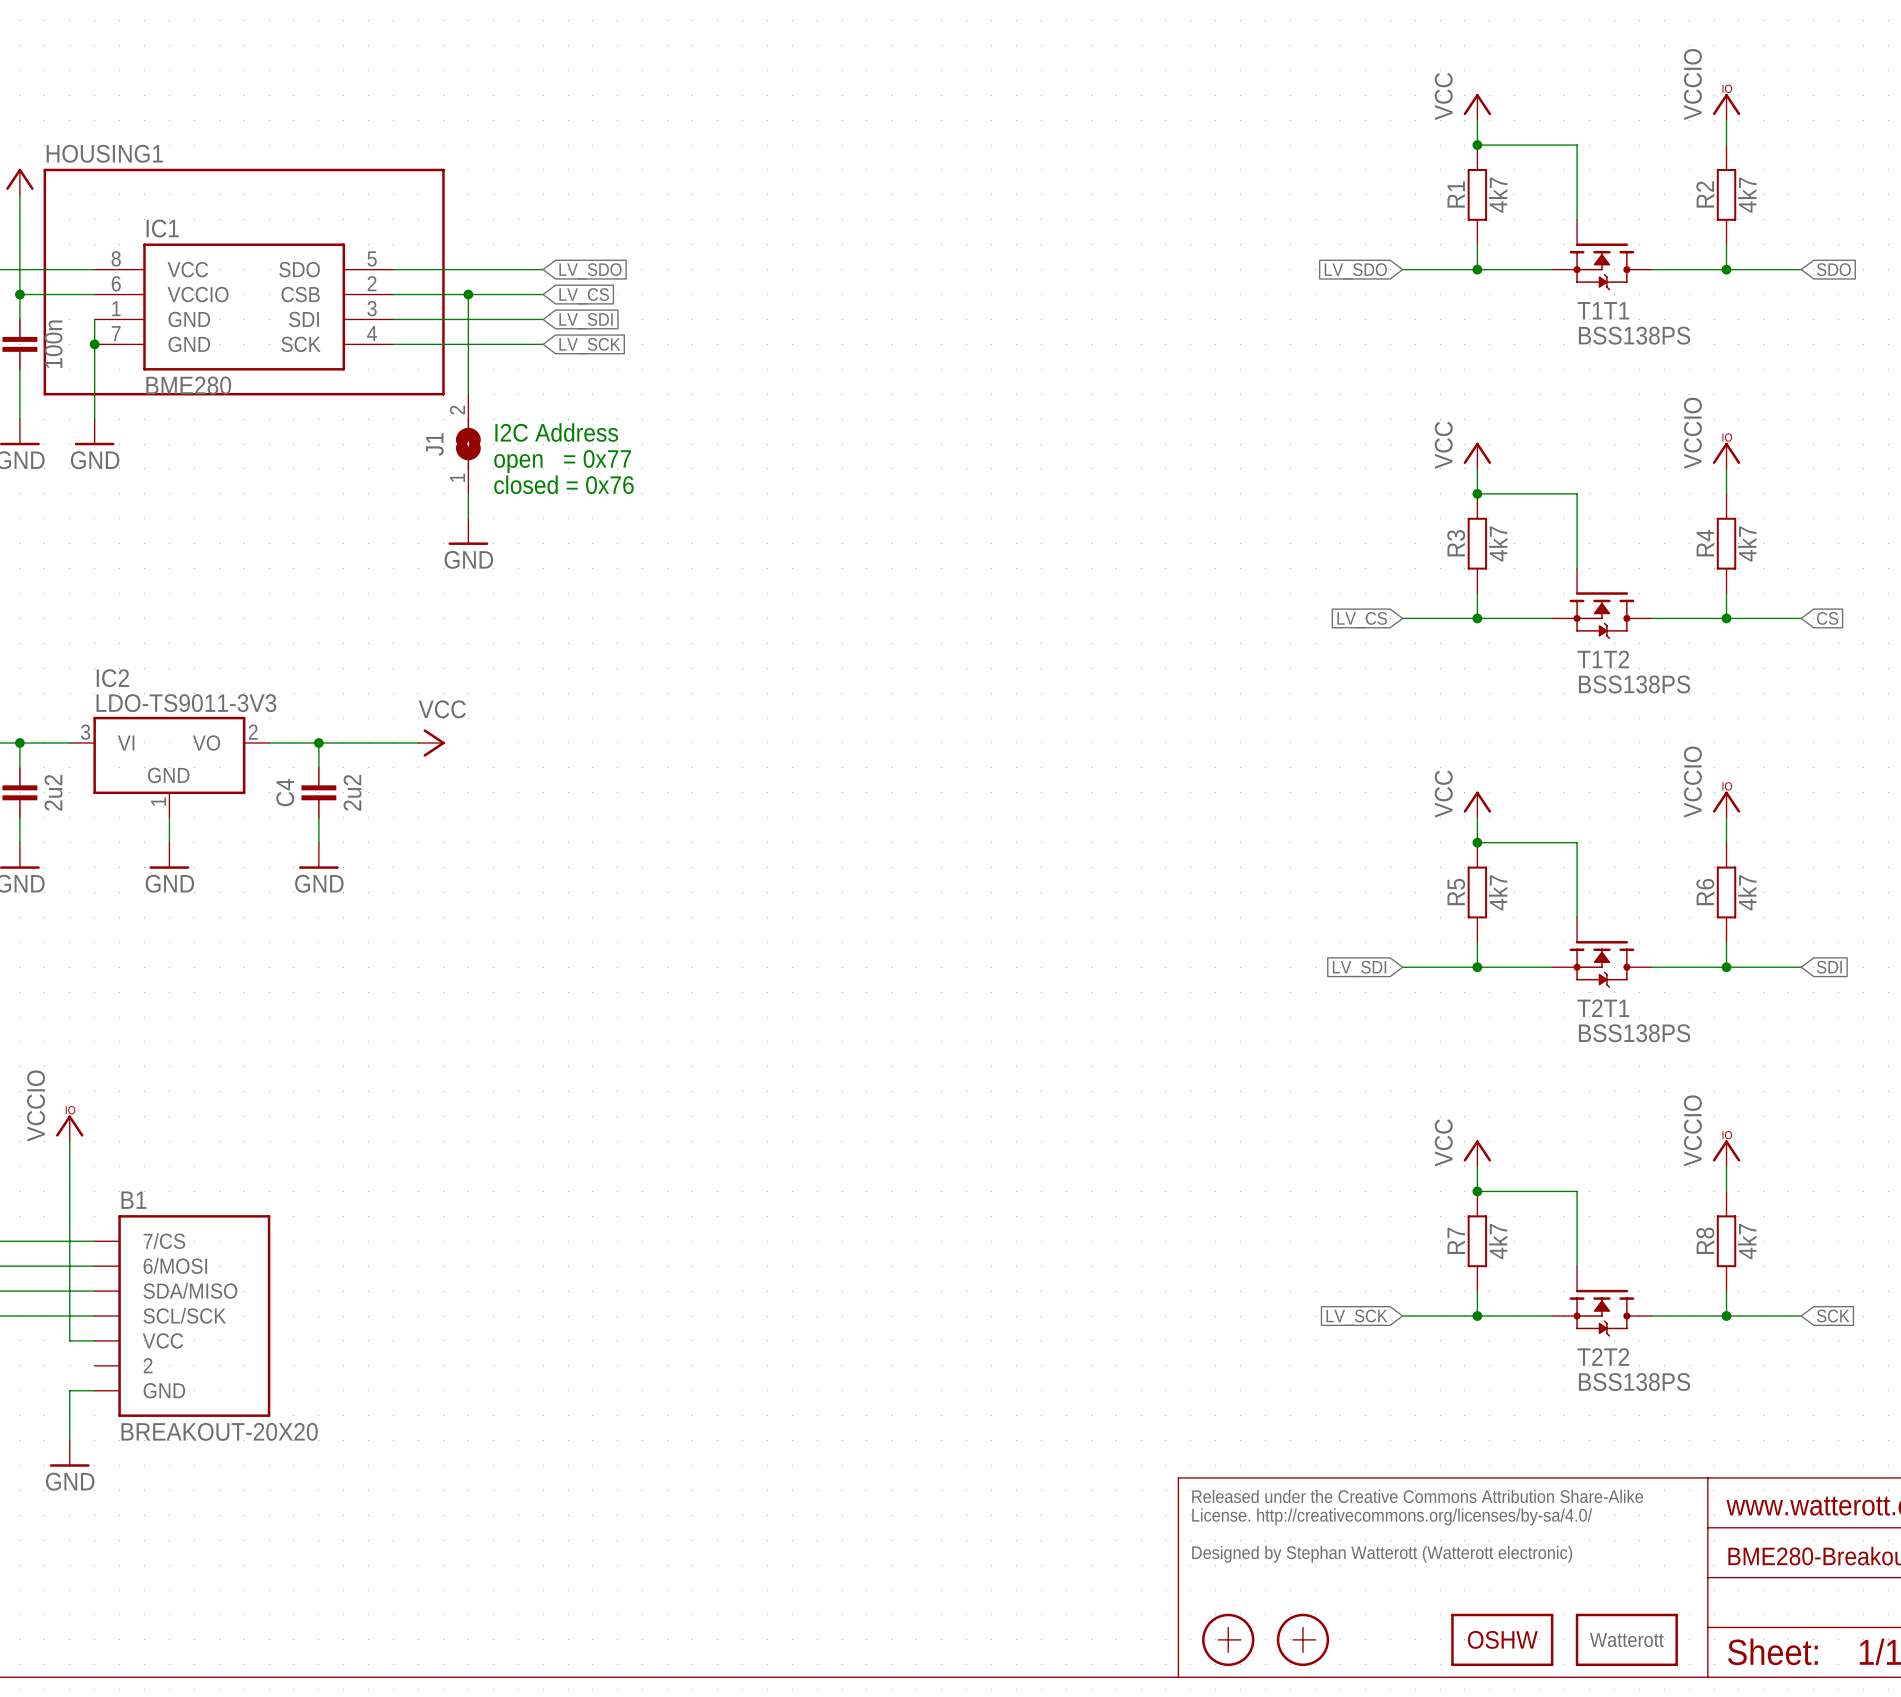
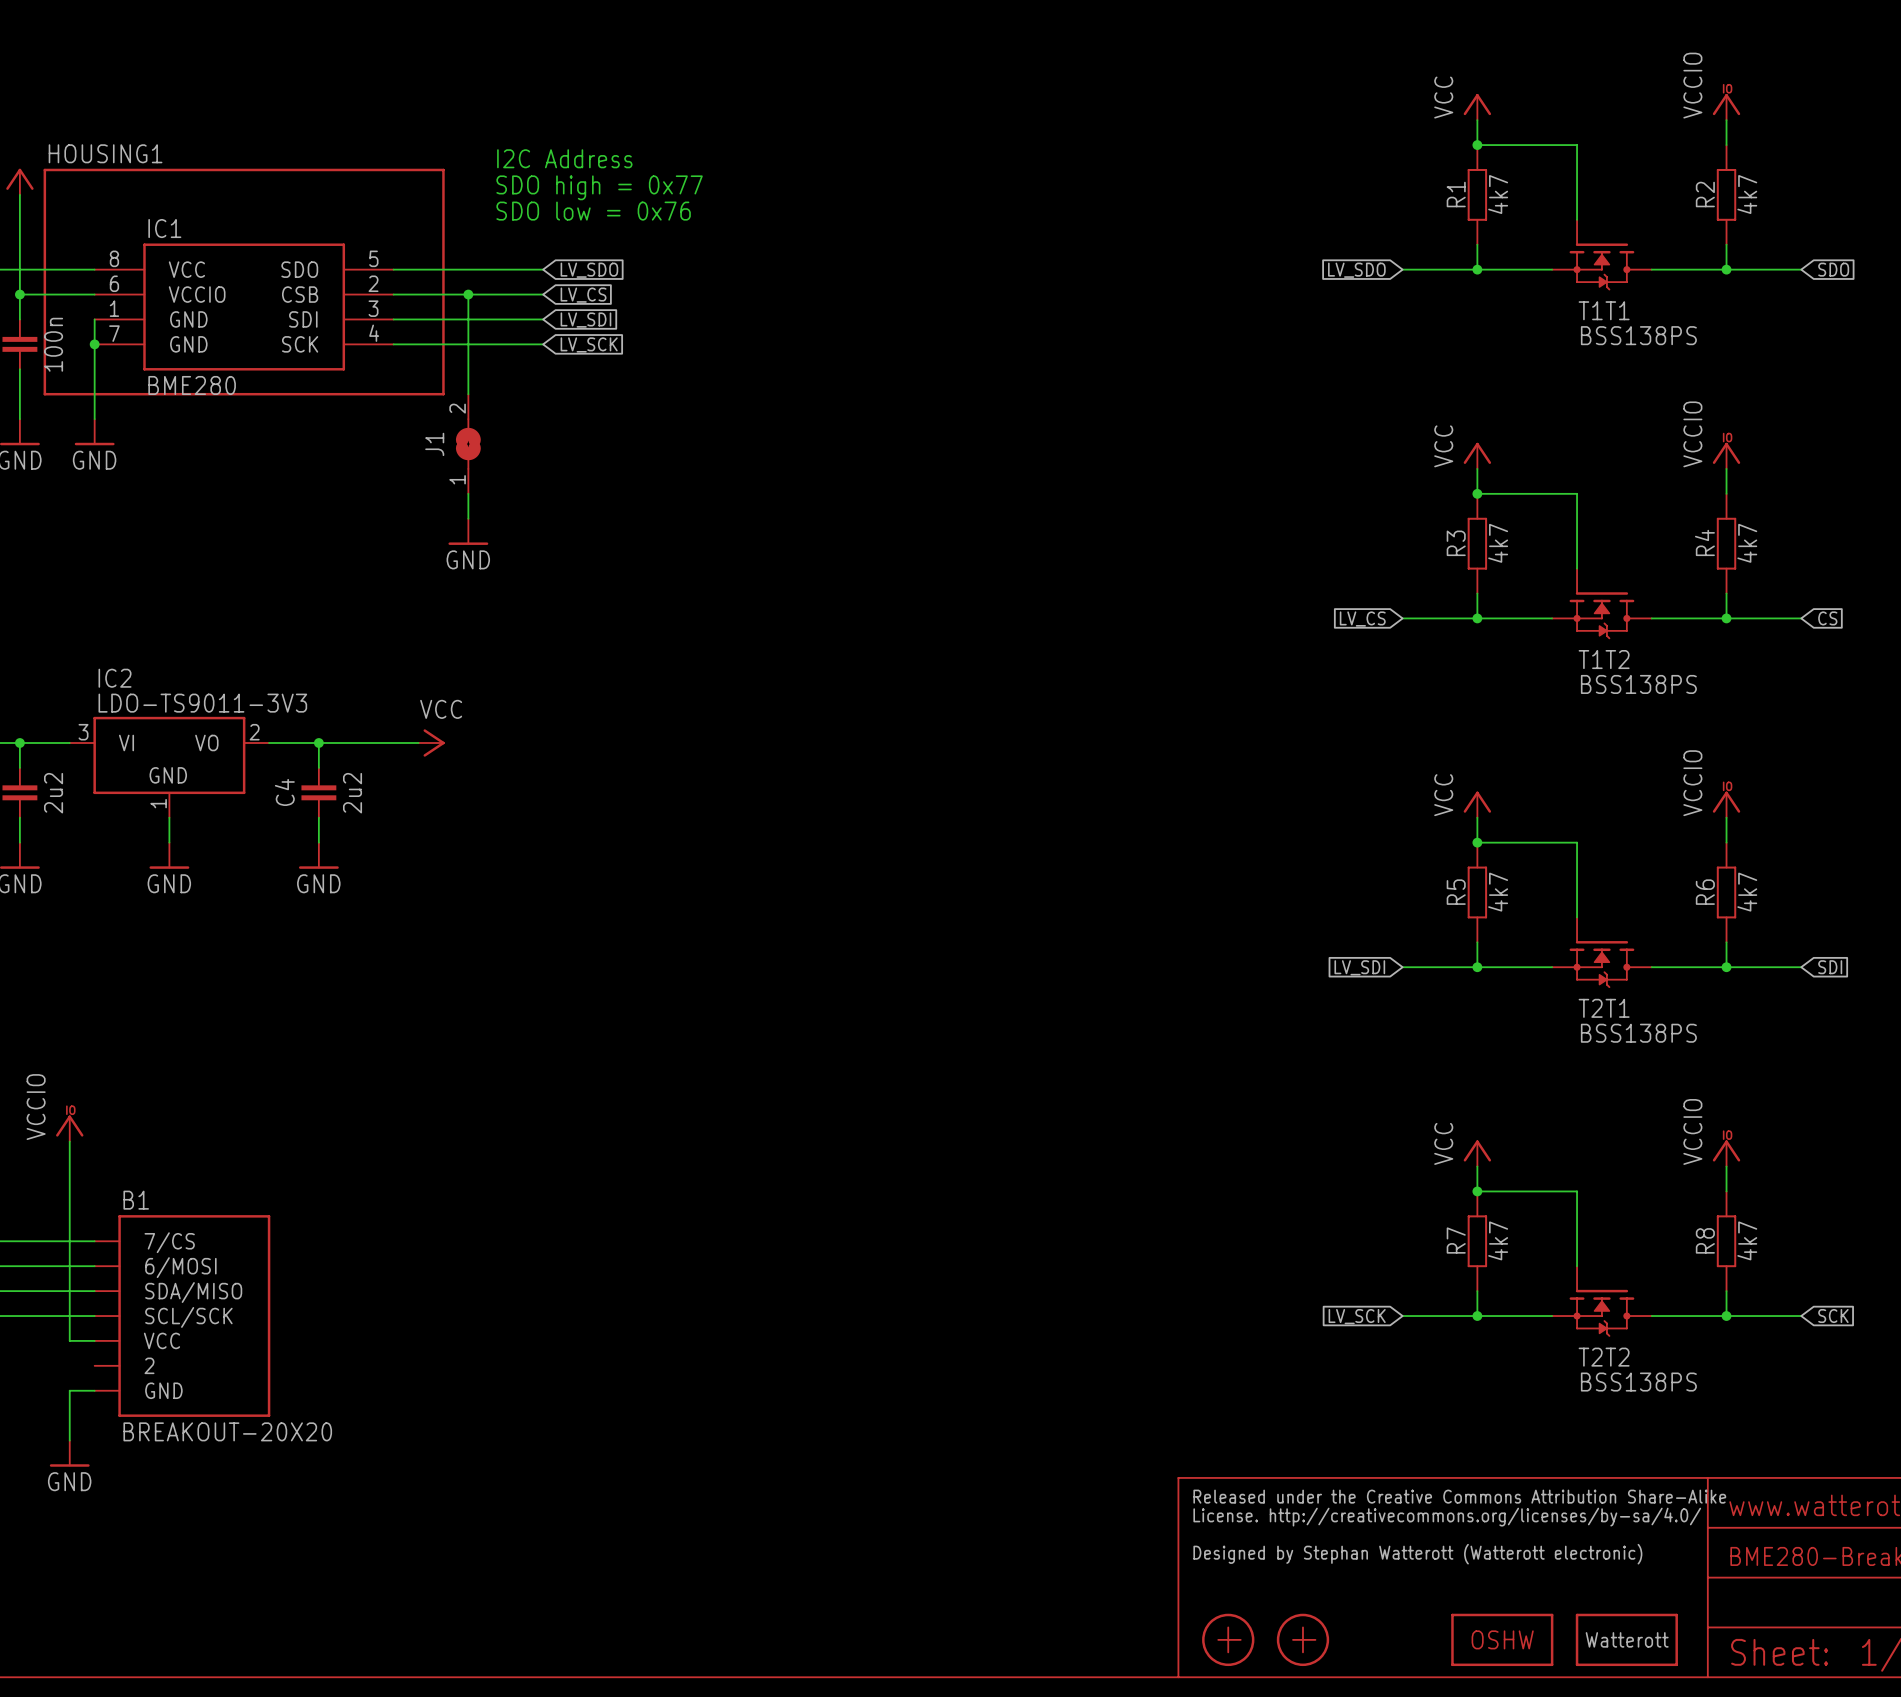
text: none -> I2C Address (564, 158)
text: none -> SDO high = 0x77 (599, 187)
text: none -> SDO low = 0x76 (593, 211)
text: I2C Address (556, 432) -> none
text: open = 0x77 (562, 461) -> none
text: closed = 0x76 (563, 484) -> none

